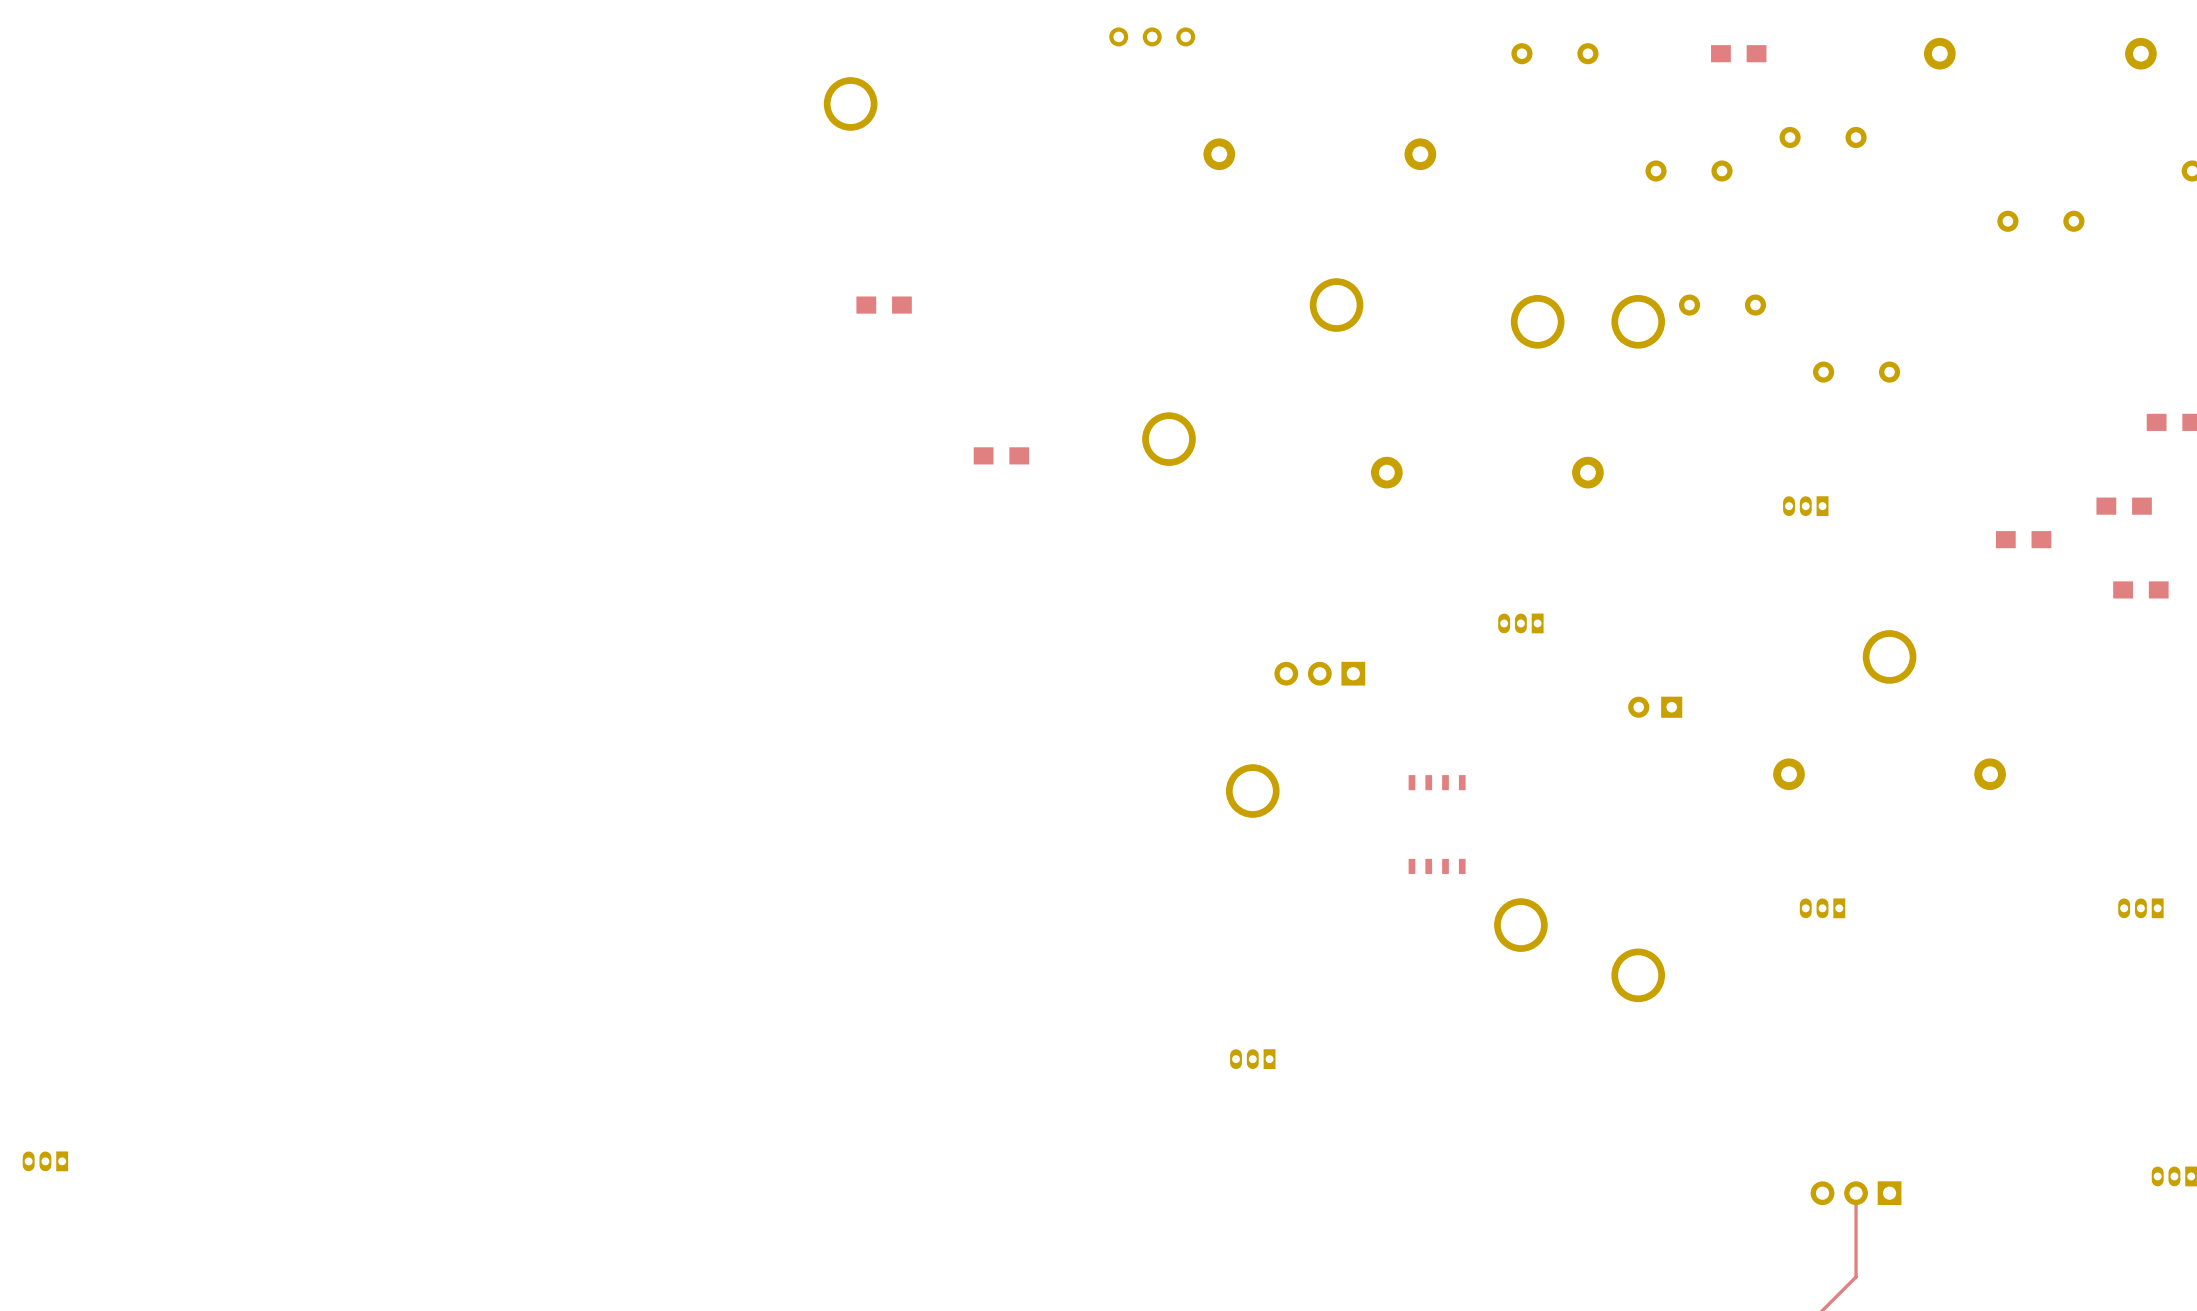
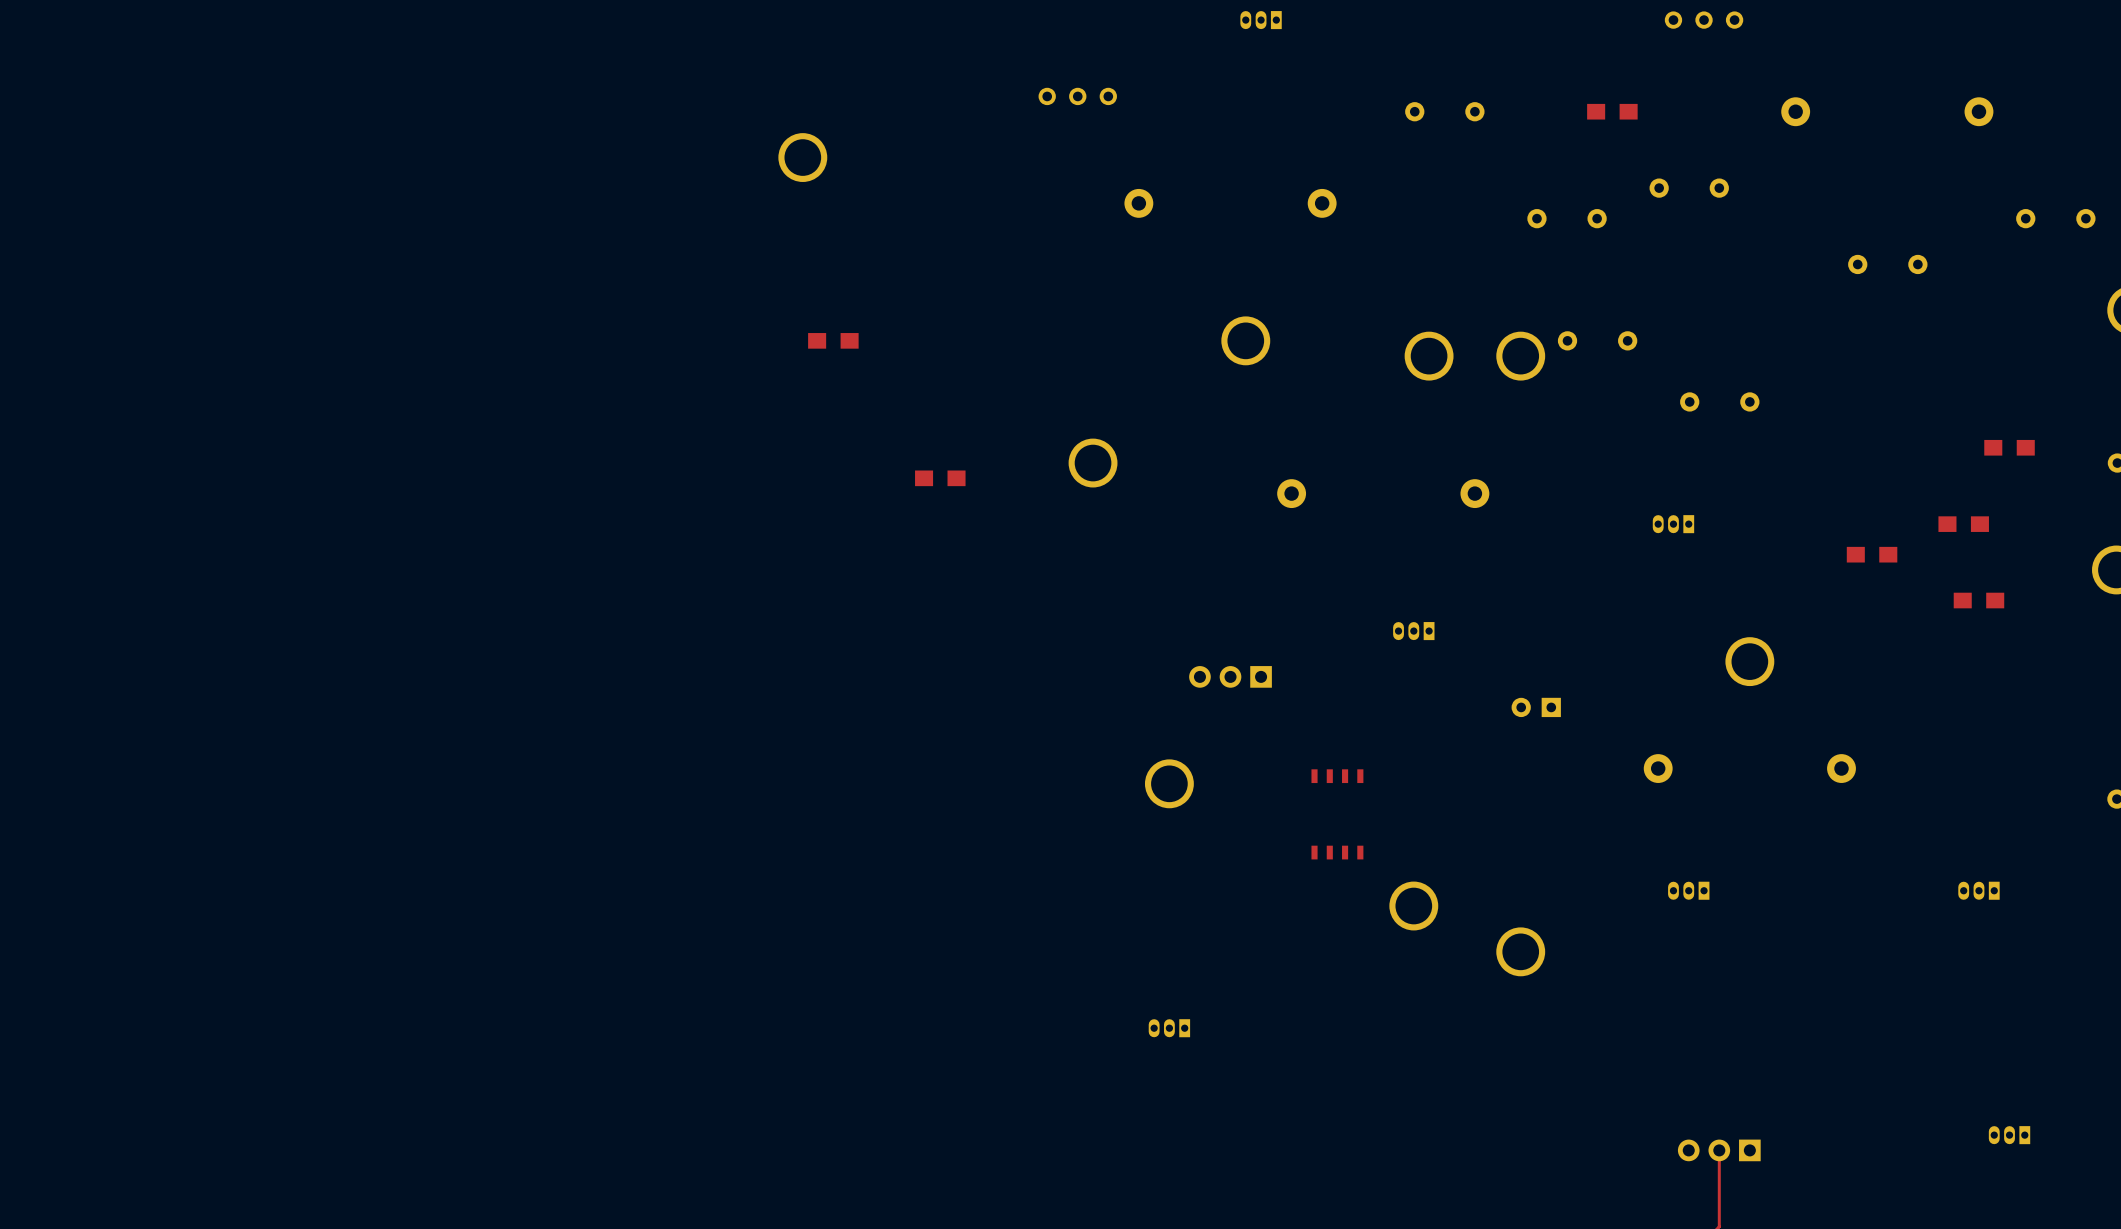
part: (45, 1161) -> none

